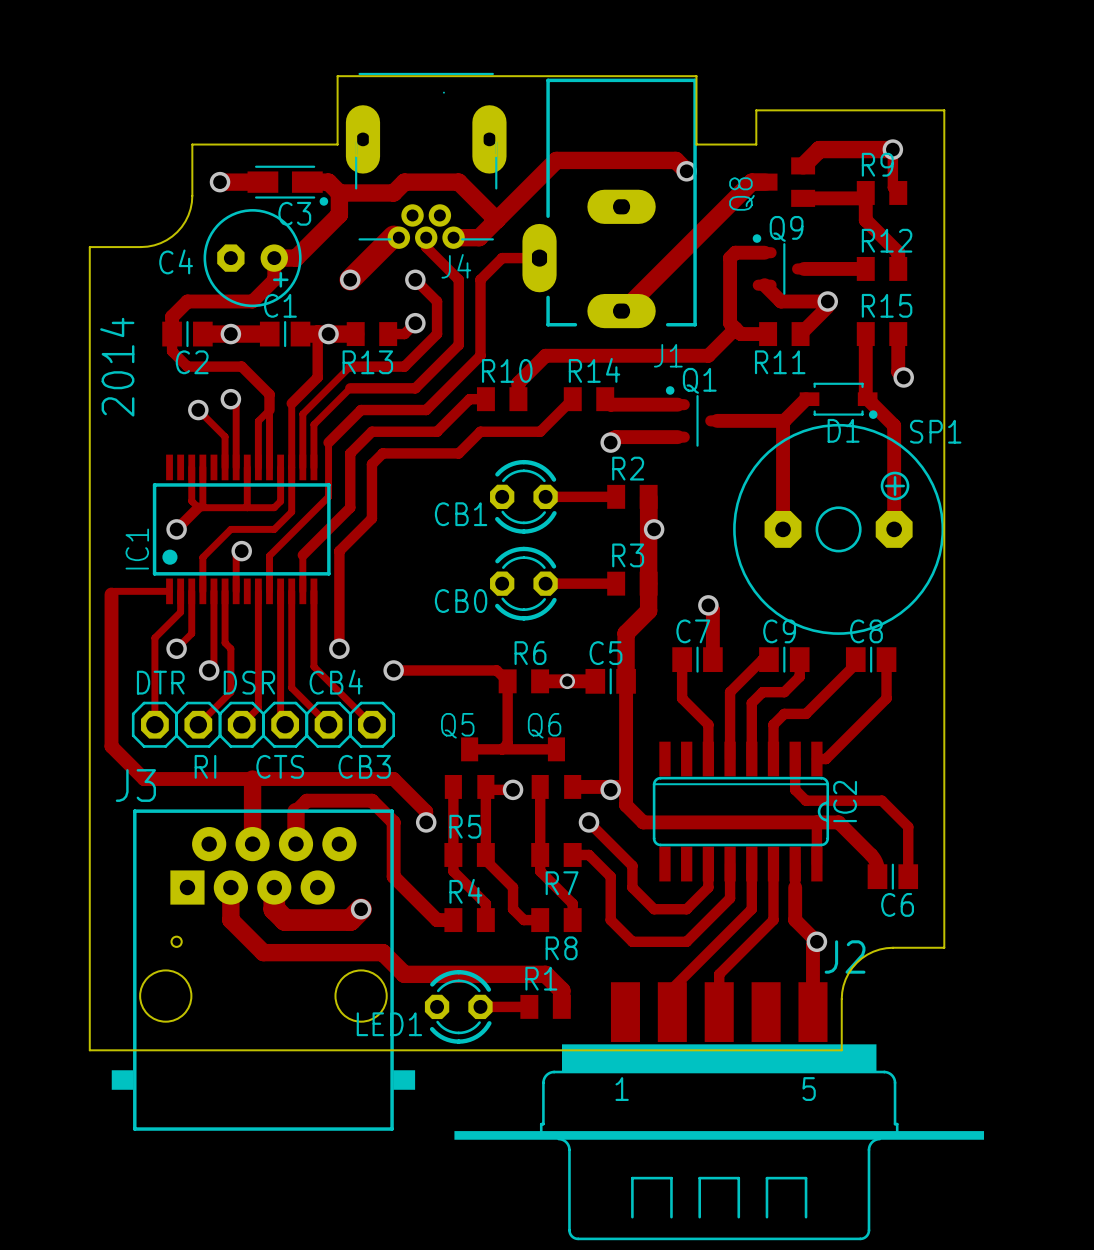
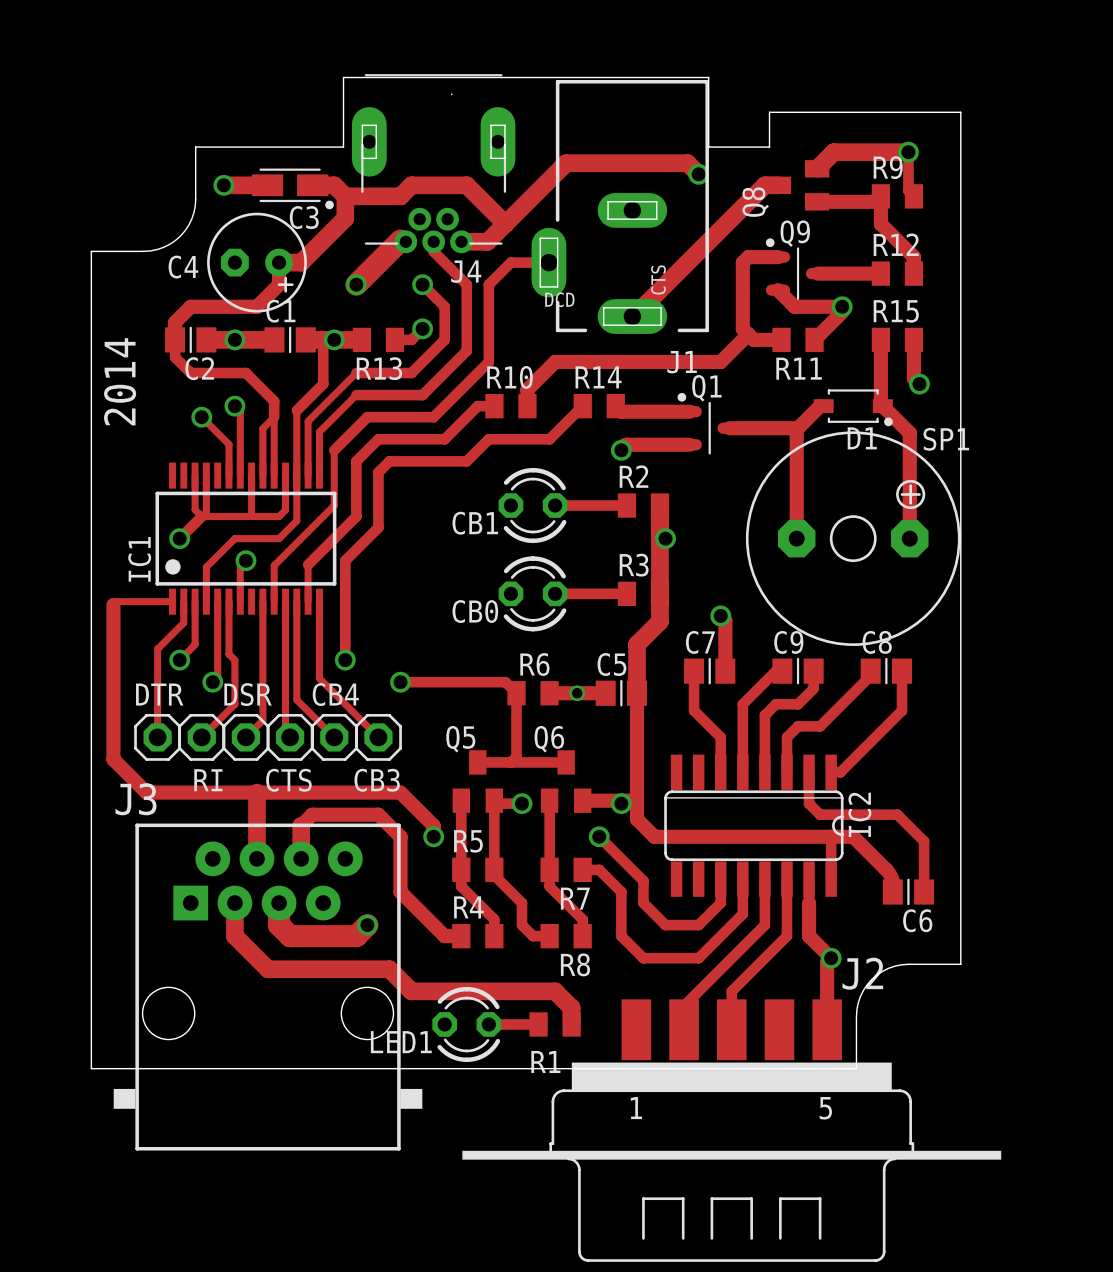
text: none -> CTS (658, 279)
text: none -> DCD (559, 299)
hole: (176, 941) -> none
R1 name position: R1 (541, 978) -> R1 (545, 1062)

